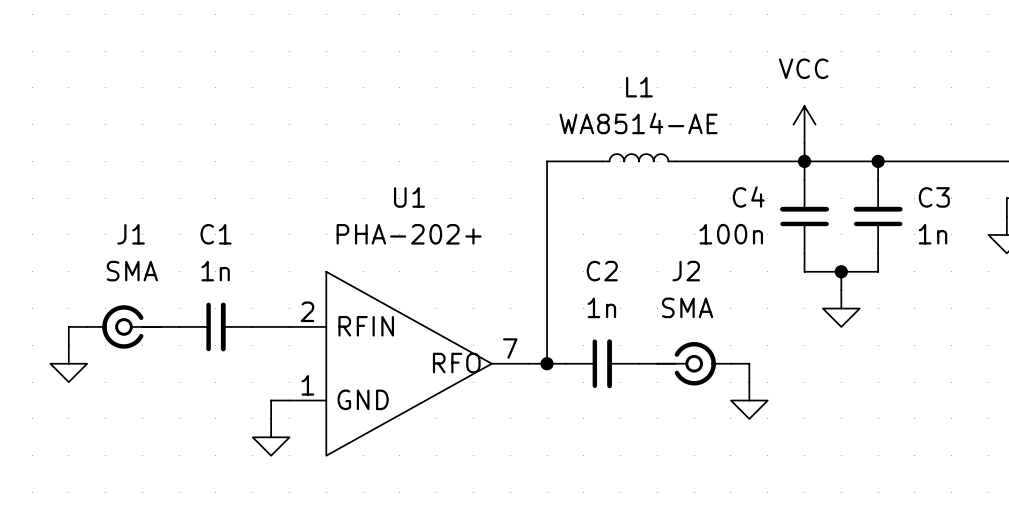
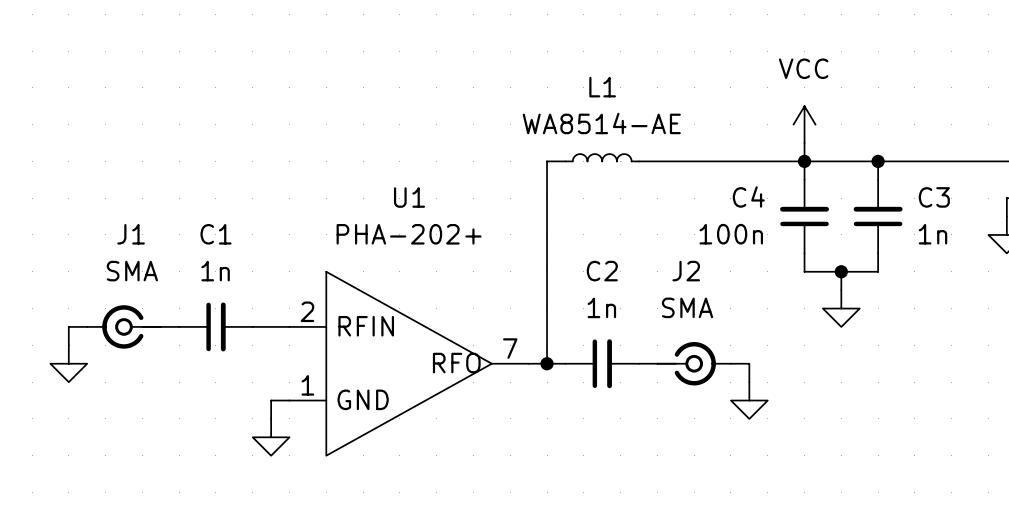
L1 position: (638, 157) -> (602, 157)
wire: (565, 161) (602, 161) -> (638, 161) (675, 161)

